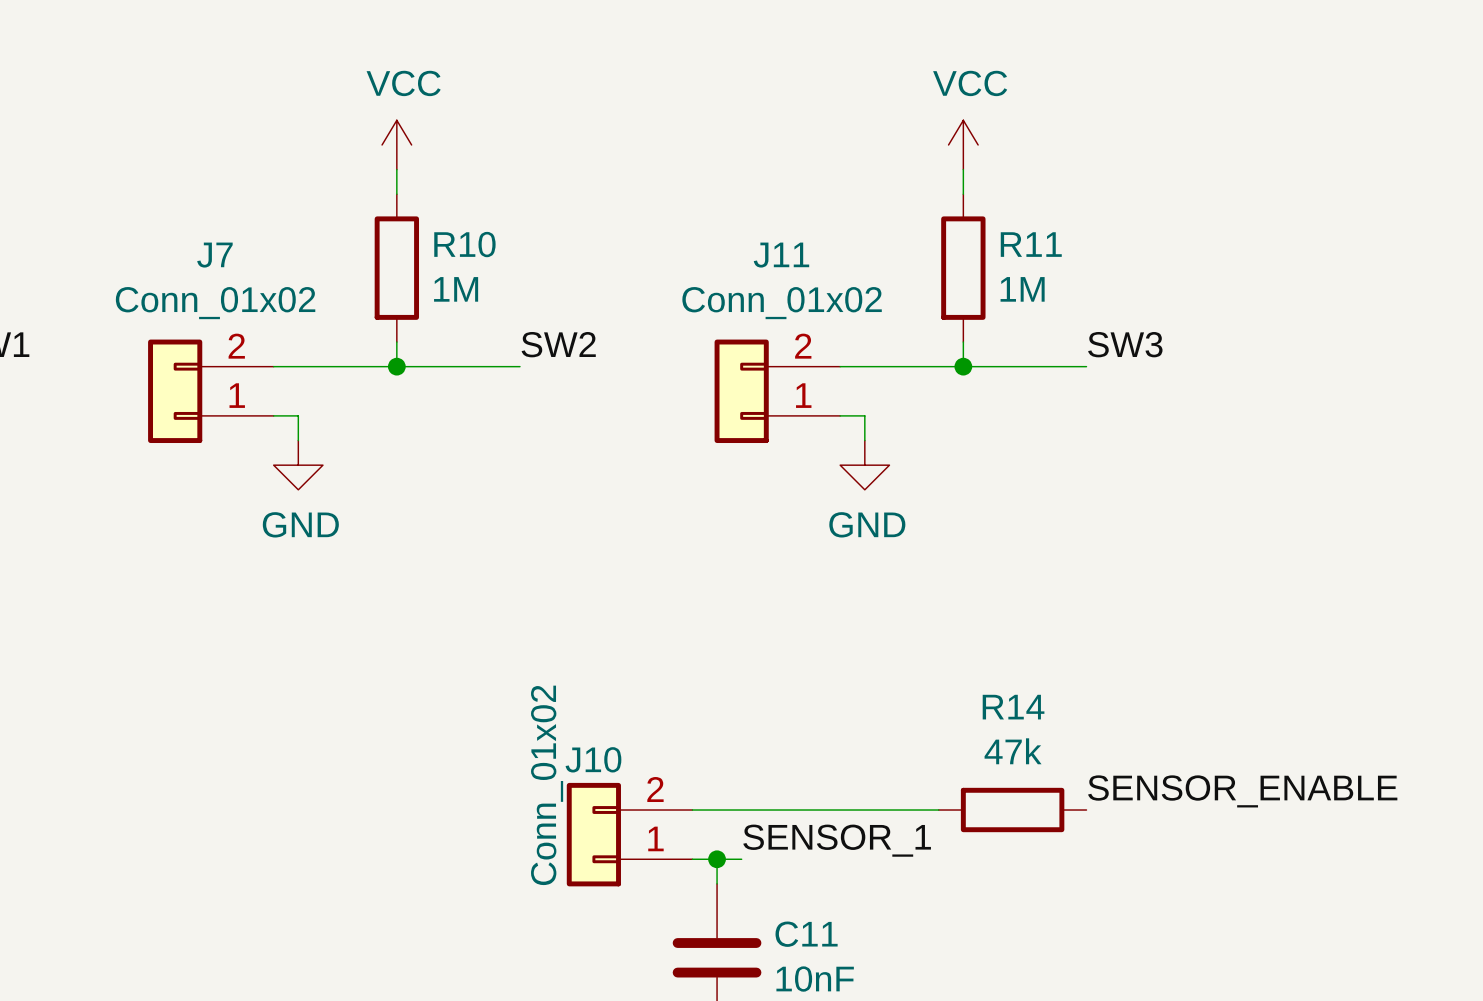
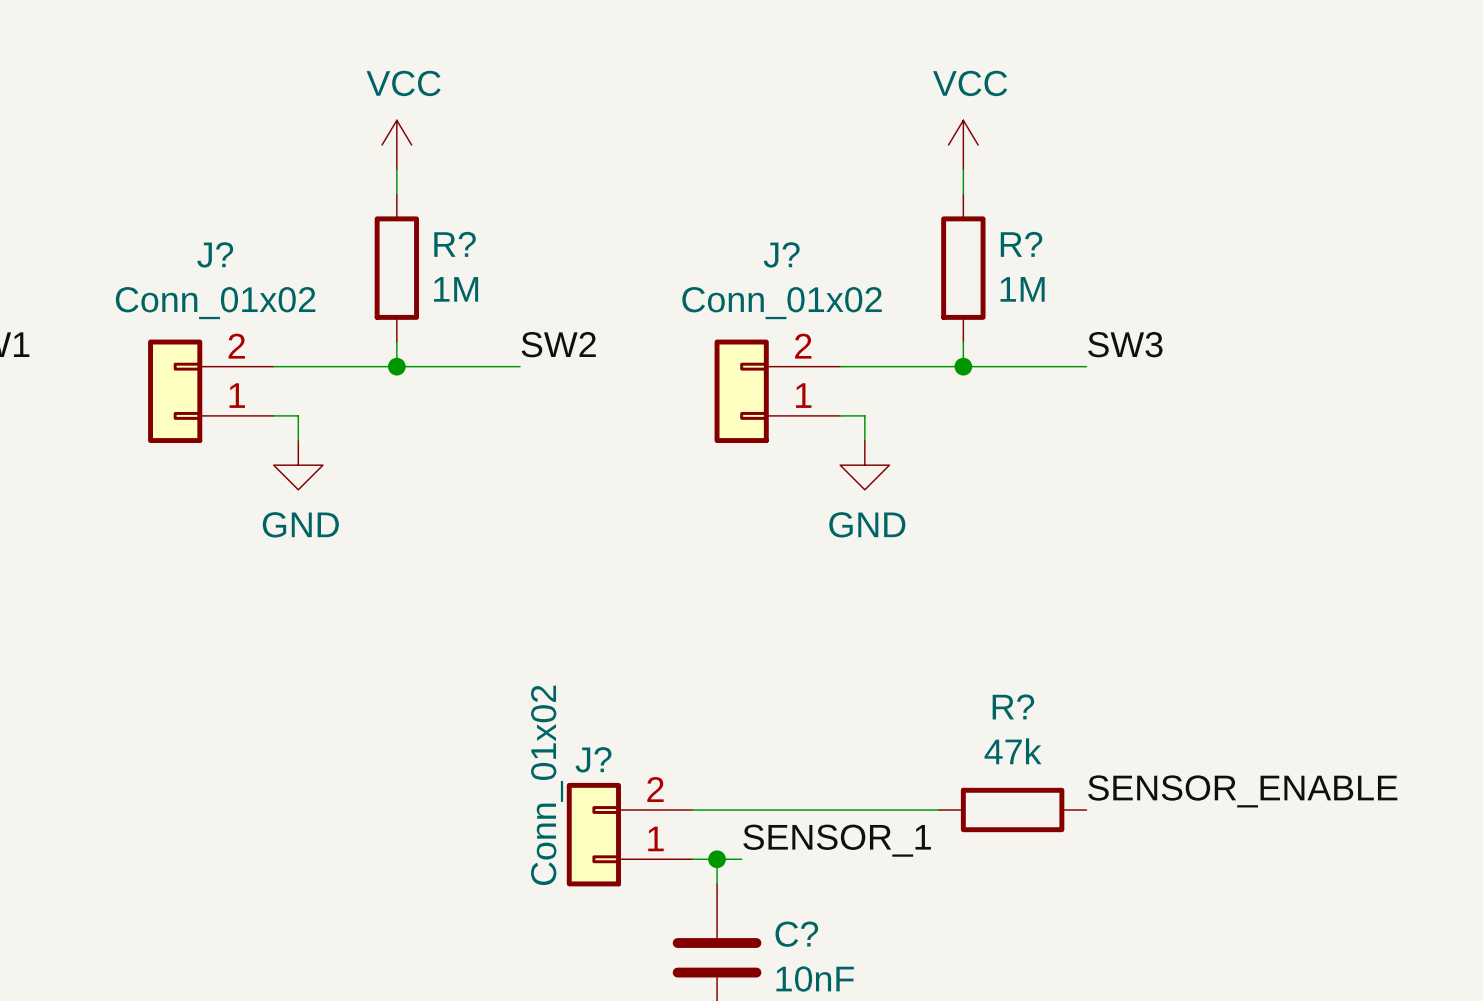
R10 name: R10 (464, 244) -> R? (455, 244)
R11 name: R11 (1031, 244) -> R? (1021, 244)
J7 name: J7 (214, 255) -> J? (215, 254)
J11 name: J11 (781, 255) -> J? (781, 254)
R14 name: R14 (1013, 707) -> R? (1013, 706)
J10 name: J10 (593, 759) -> J? (593, 759)
C11 name: C11 (806, 934) -> C? (796, 934)

